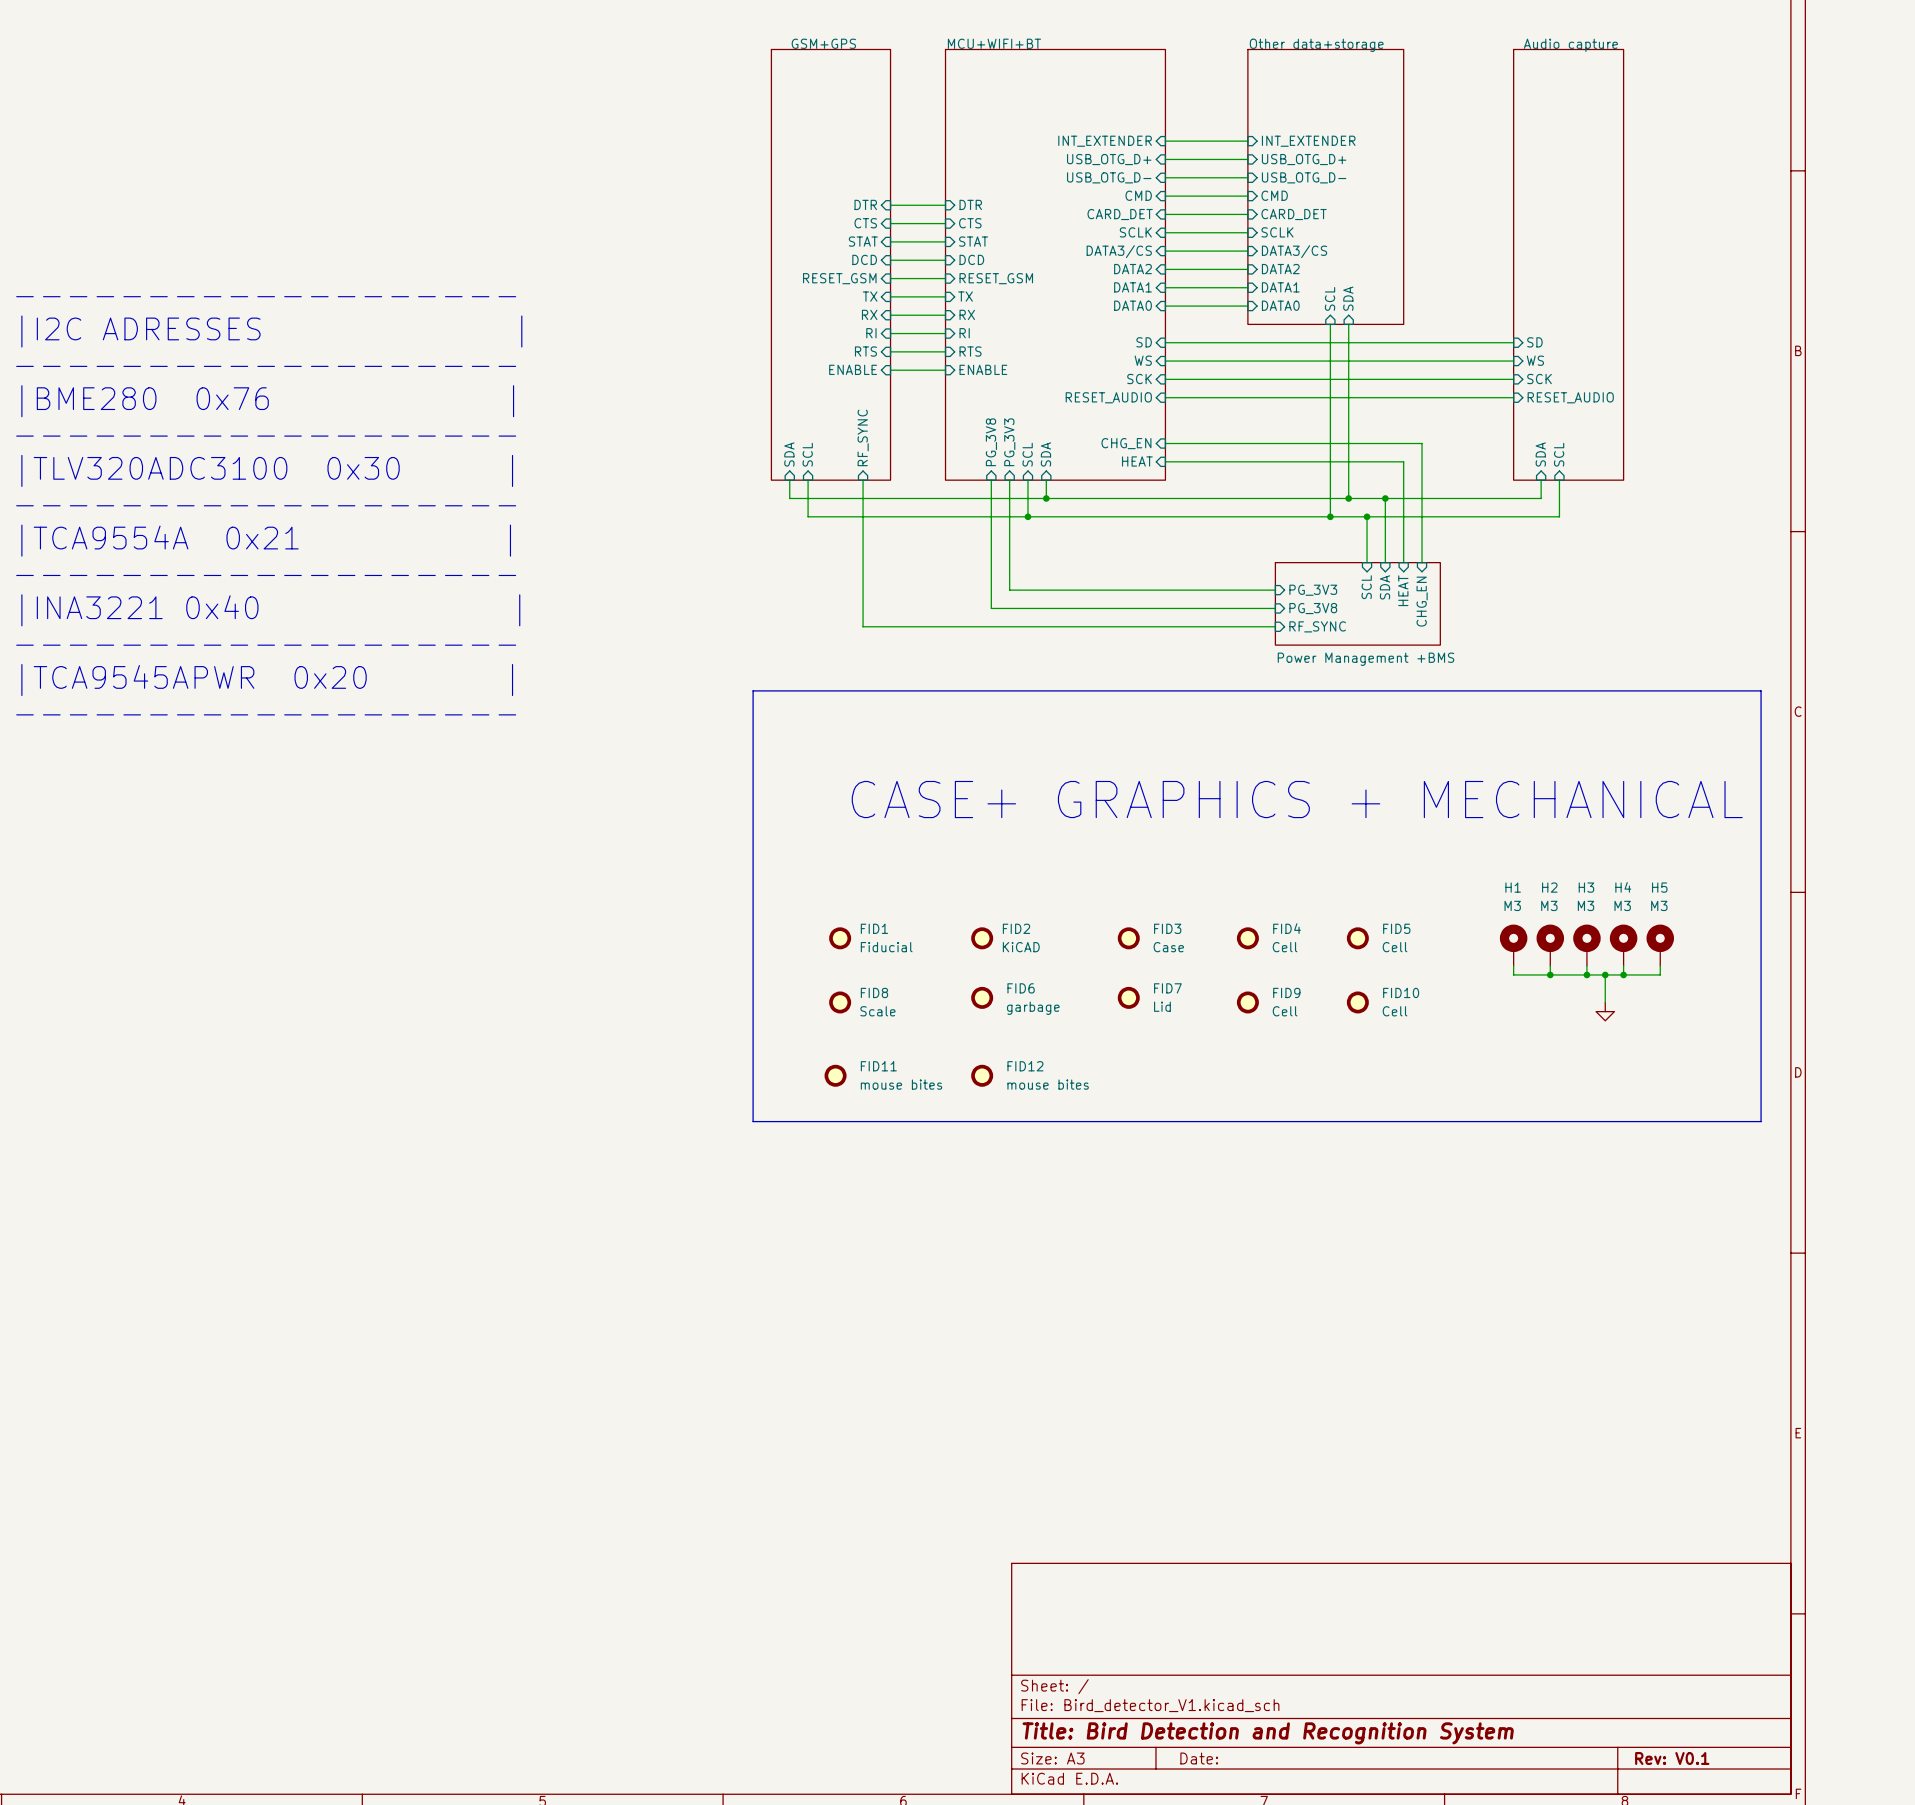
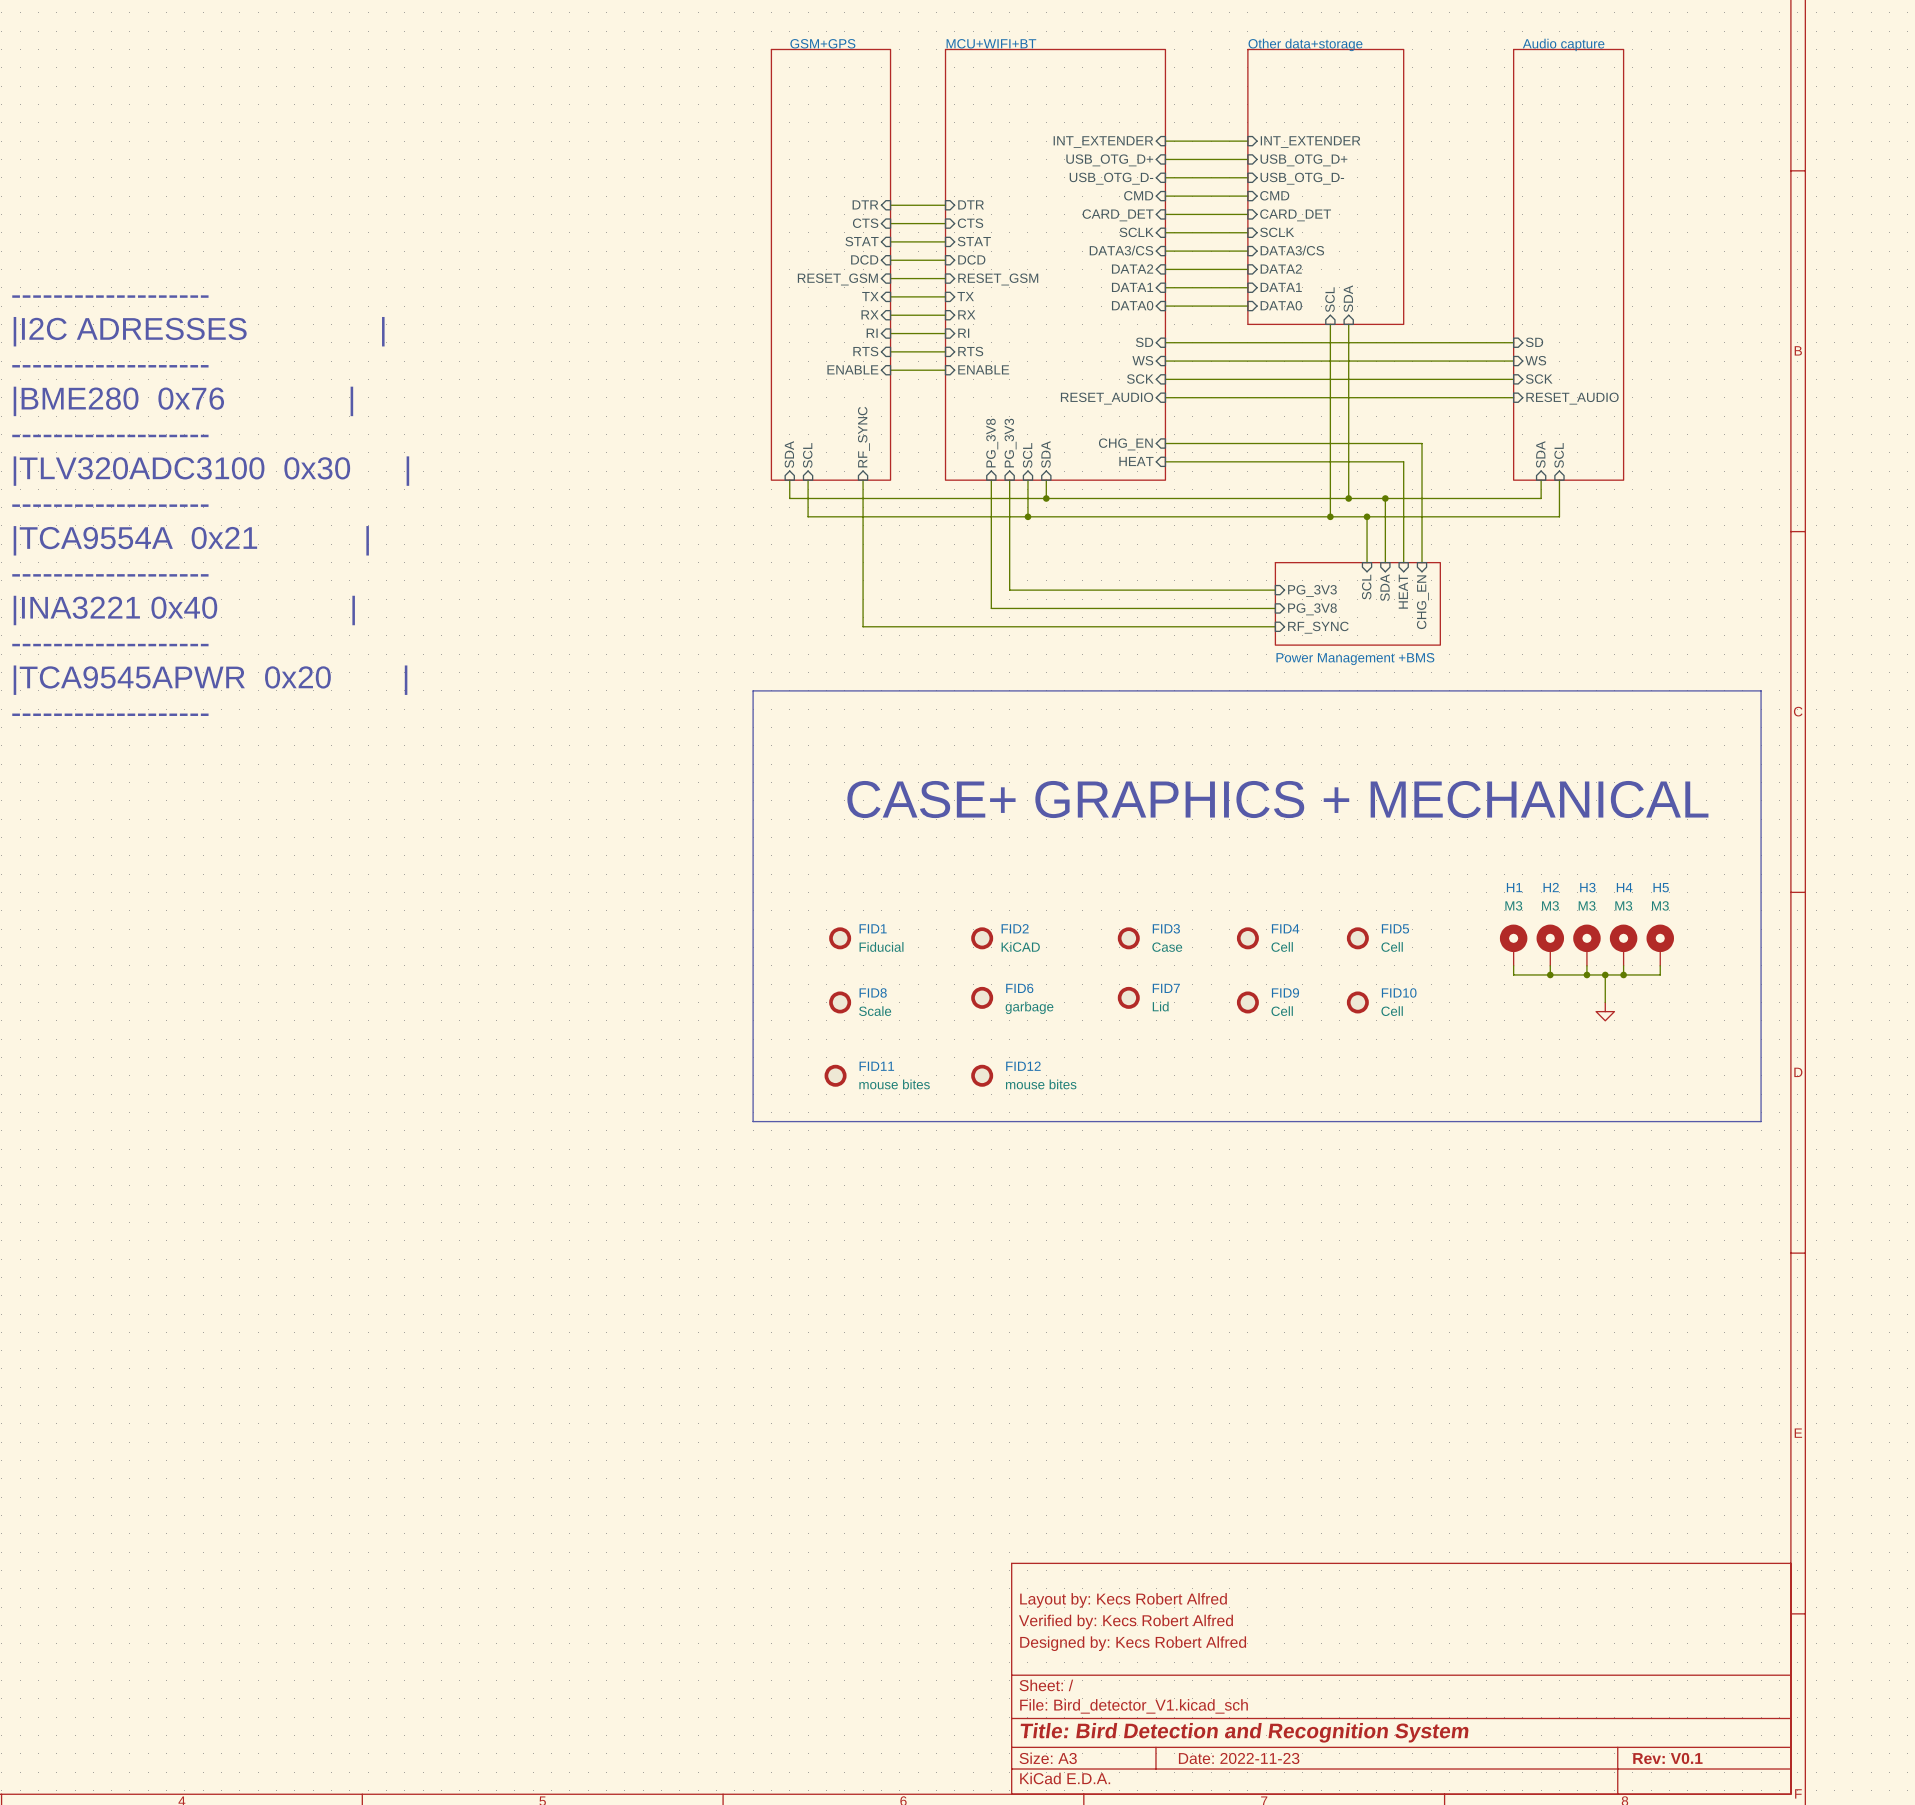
title block: none -> Layout by: Kecs Robert Alfred (1123, 1600)
title block: none -> Verified by: Kecs Robert Alfred (1125, 1622)
title block: none -> Designed by: Kecs Robert Alfred (1133, 1643)
title block: Date: (1199, 1758) -> Date: 2022-11-23 (1239, 1758)

